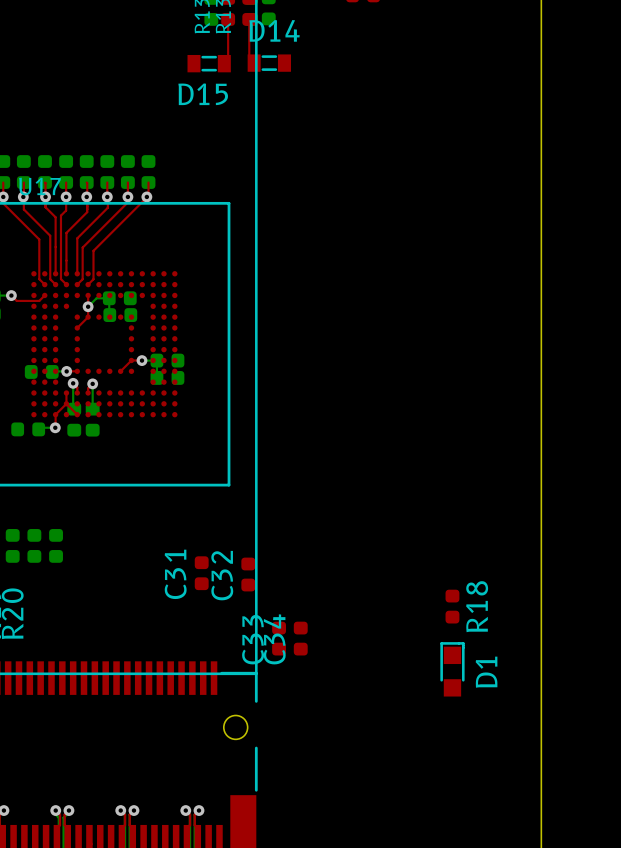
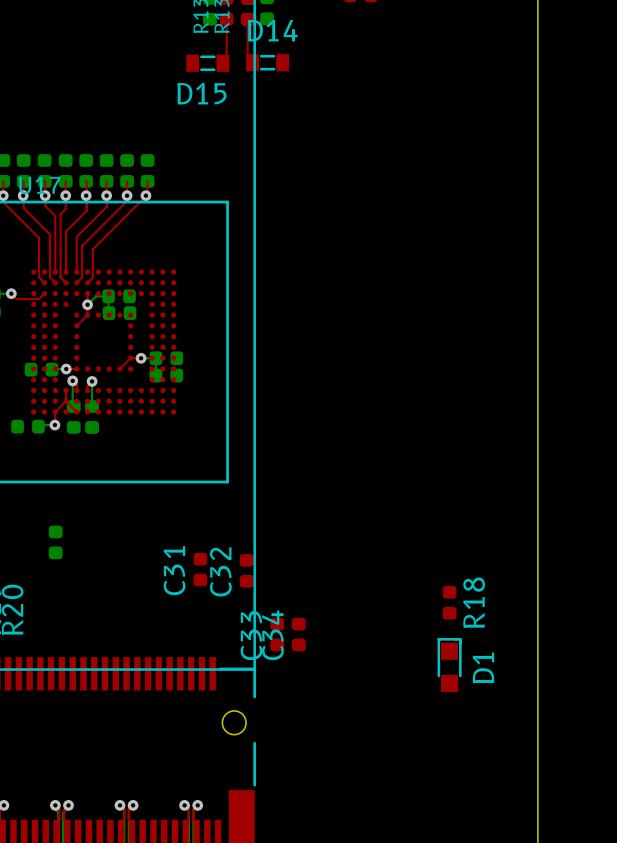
part: (12, 545) -> none
part: (34, 545) -> none

